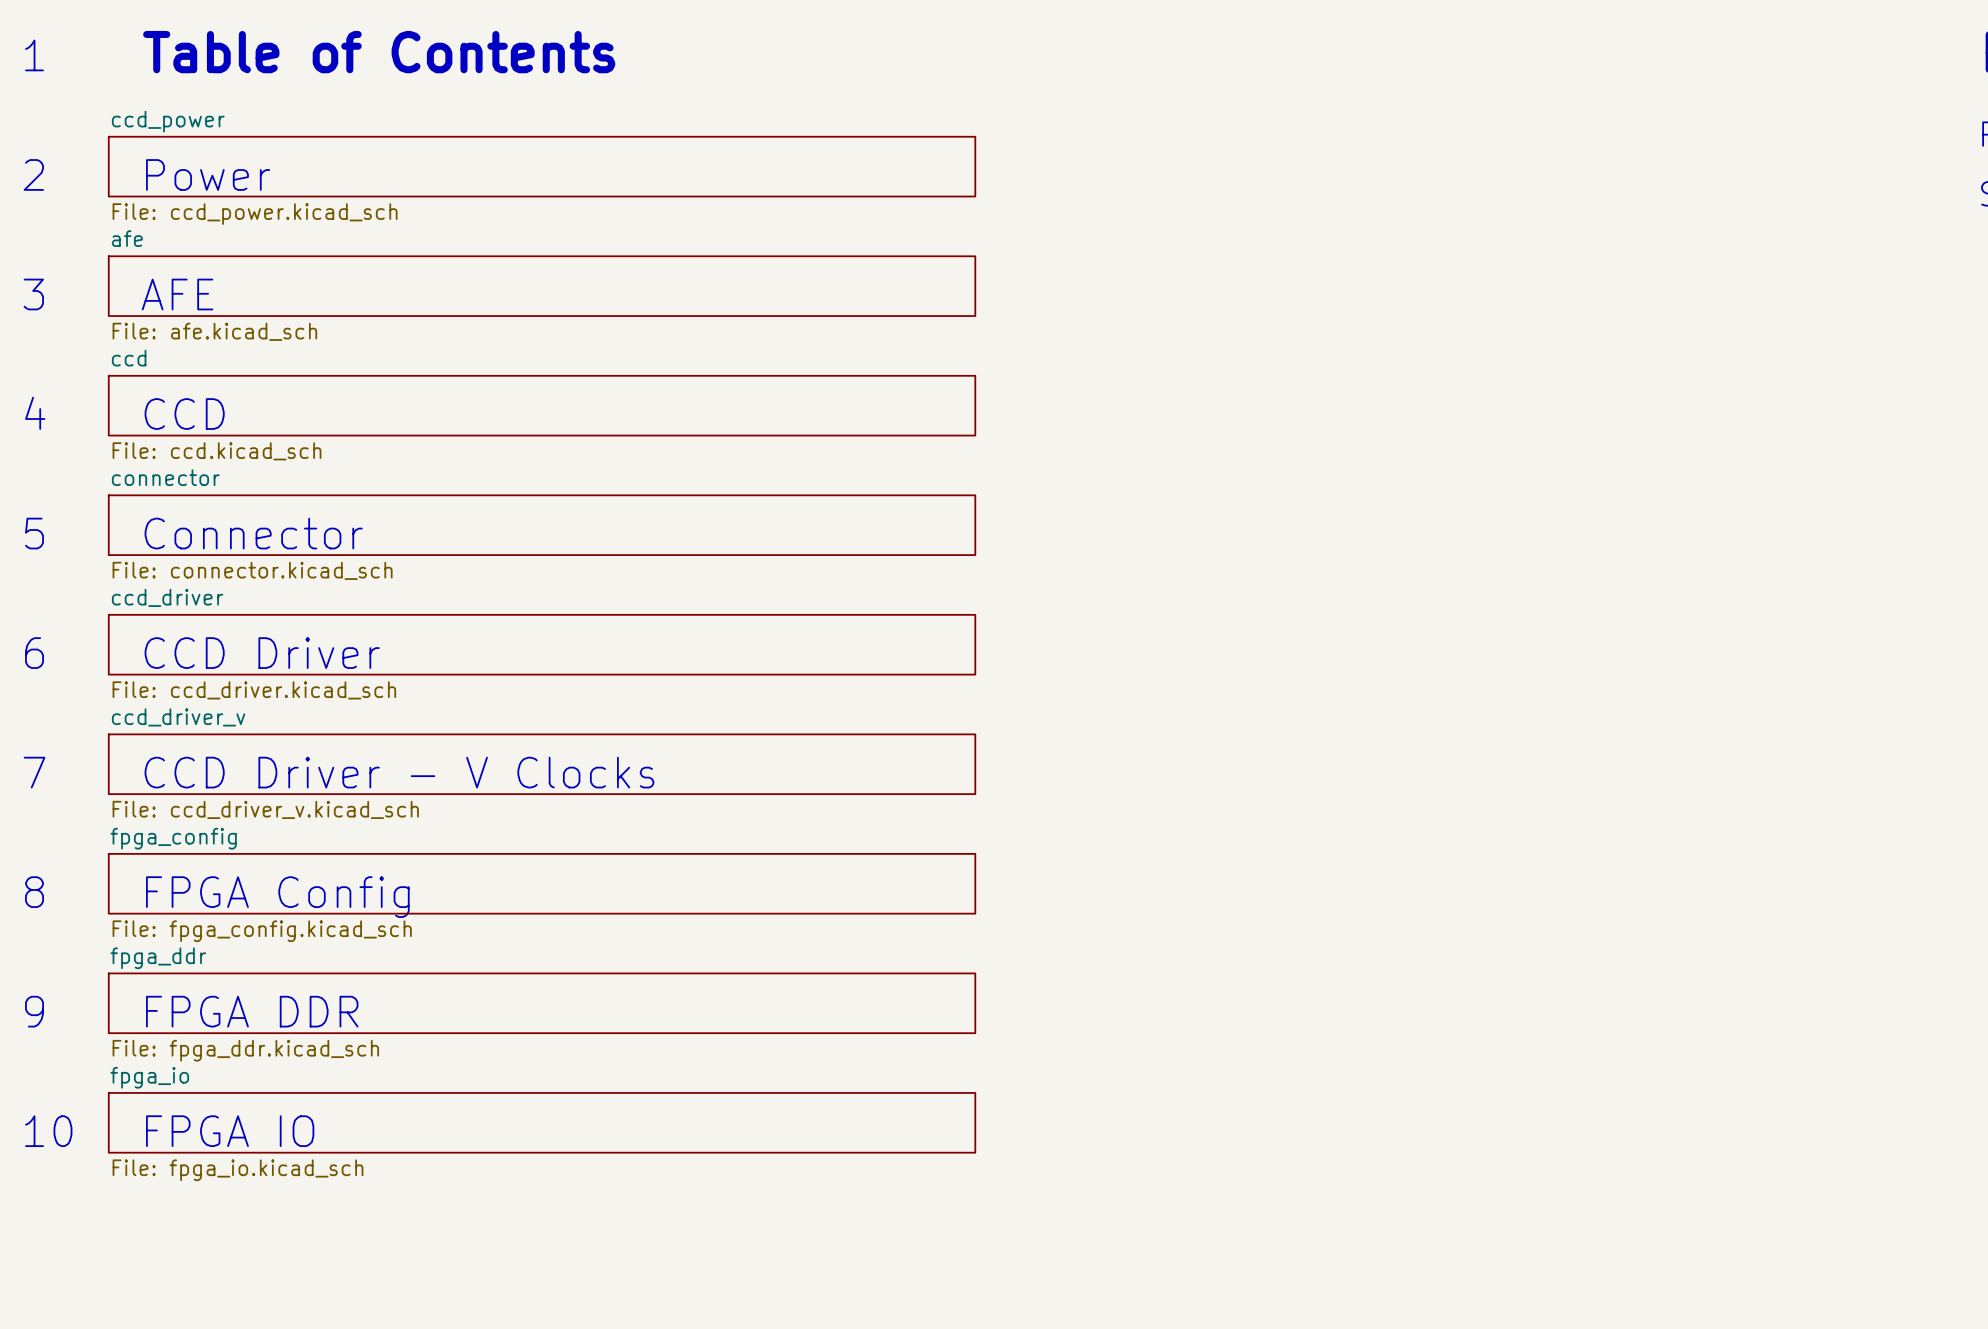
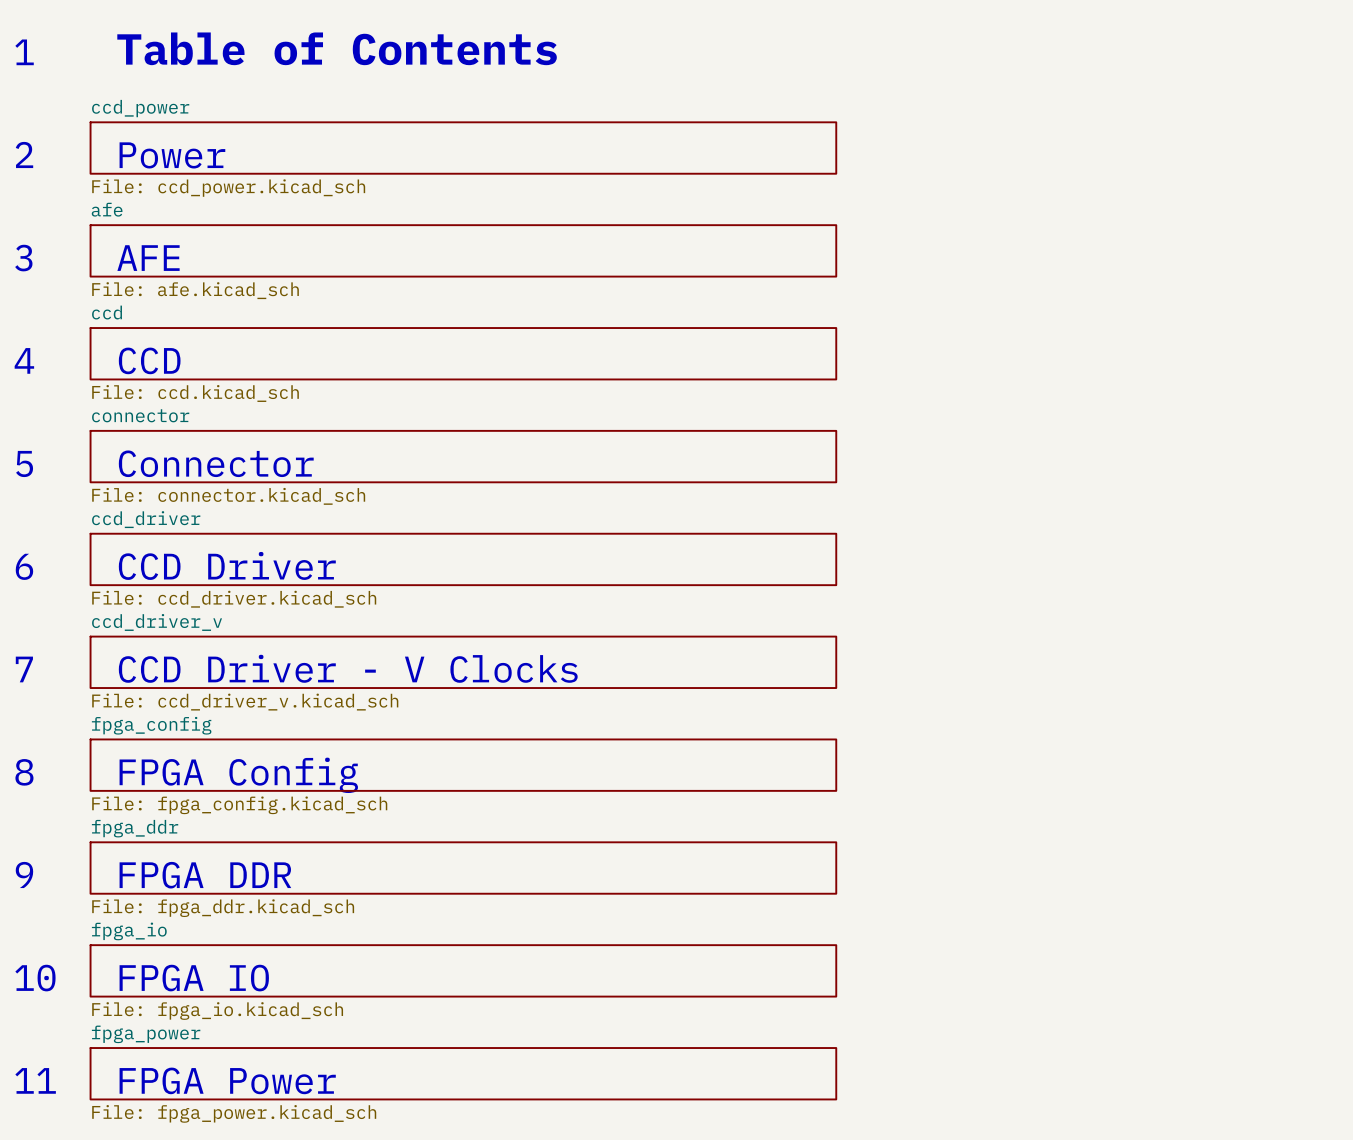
sheet fpga_power: none -> File: fpga_power.kicad_sch (463, 1073)
text: none -> 11 (35, 1080)
text: none -> FPGA Power (227, 1080)

